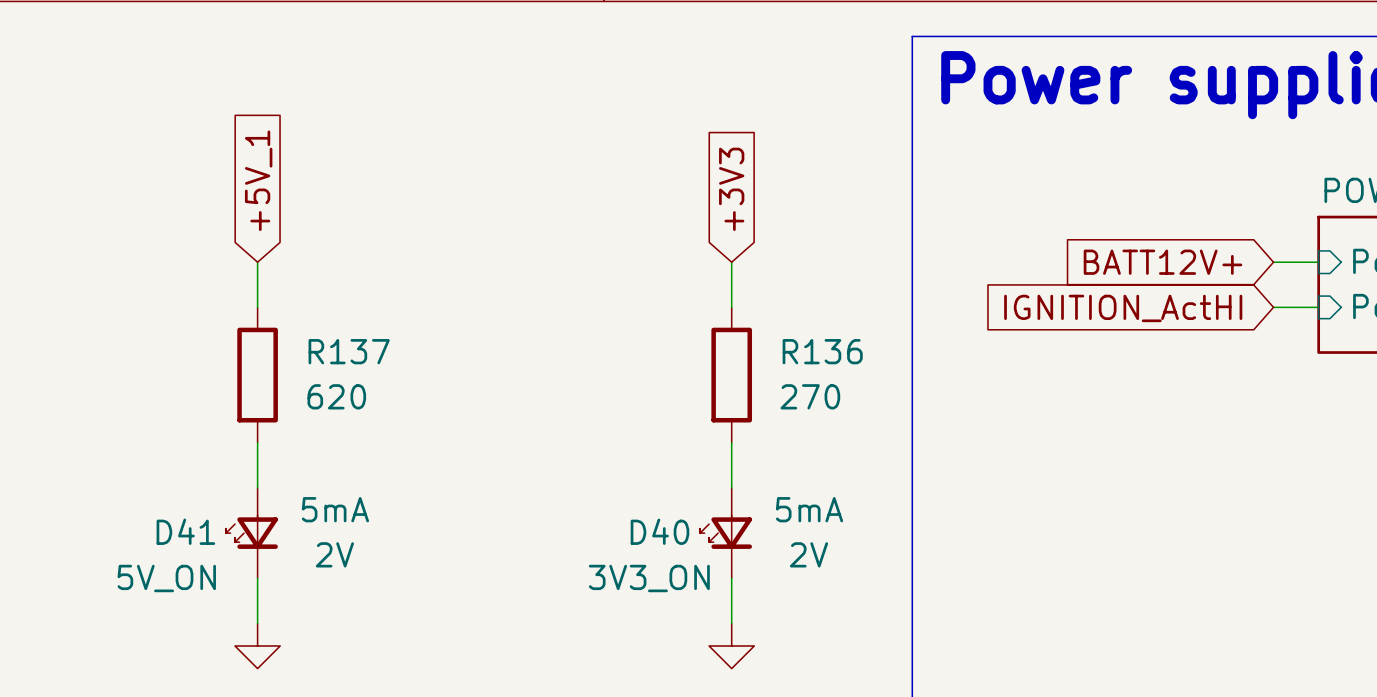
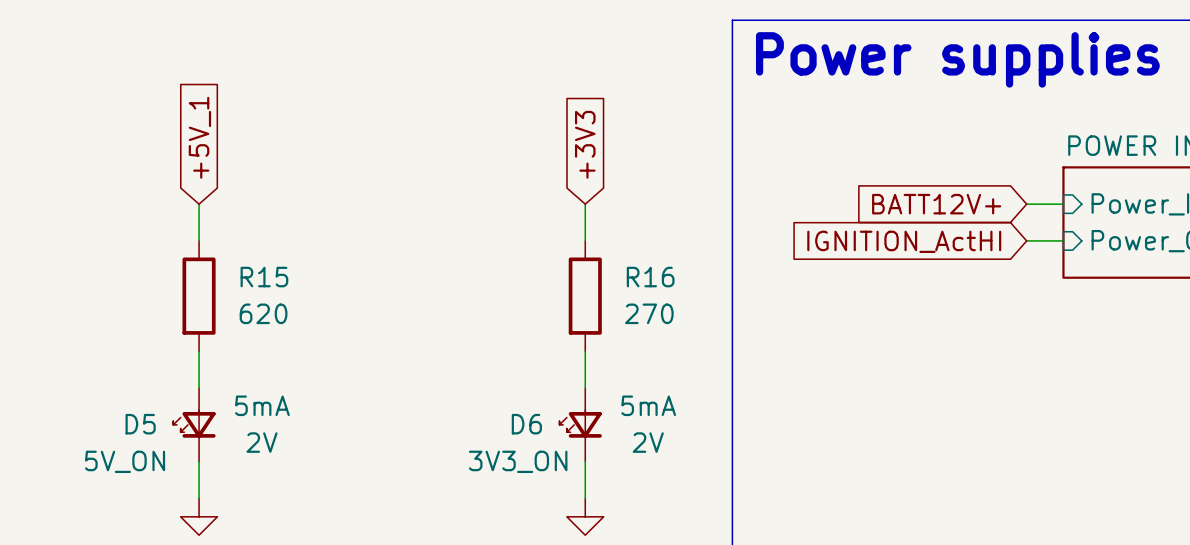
R137 name: R137 (349, 351) -> R15 (264, 277)
R136 name: R136 (822, 351) -> R16 (650, 277)
D41 name: D41 (185, 531) -> D5 (140, 424)
D40 name: D40 (659, 531) -> D6 (526, 424)

